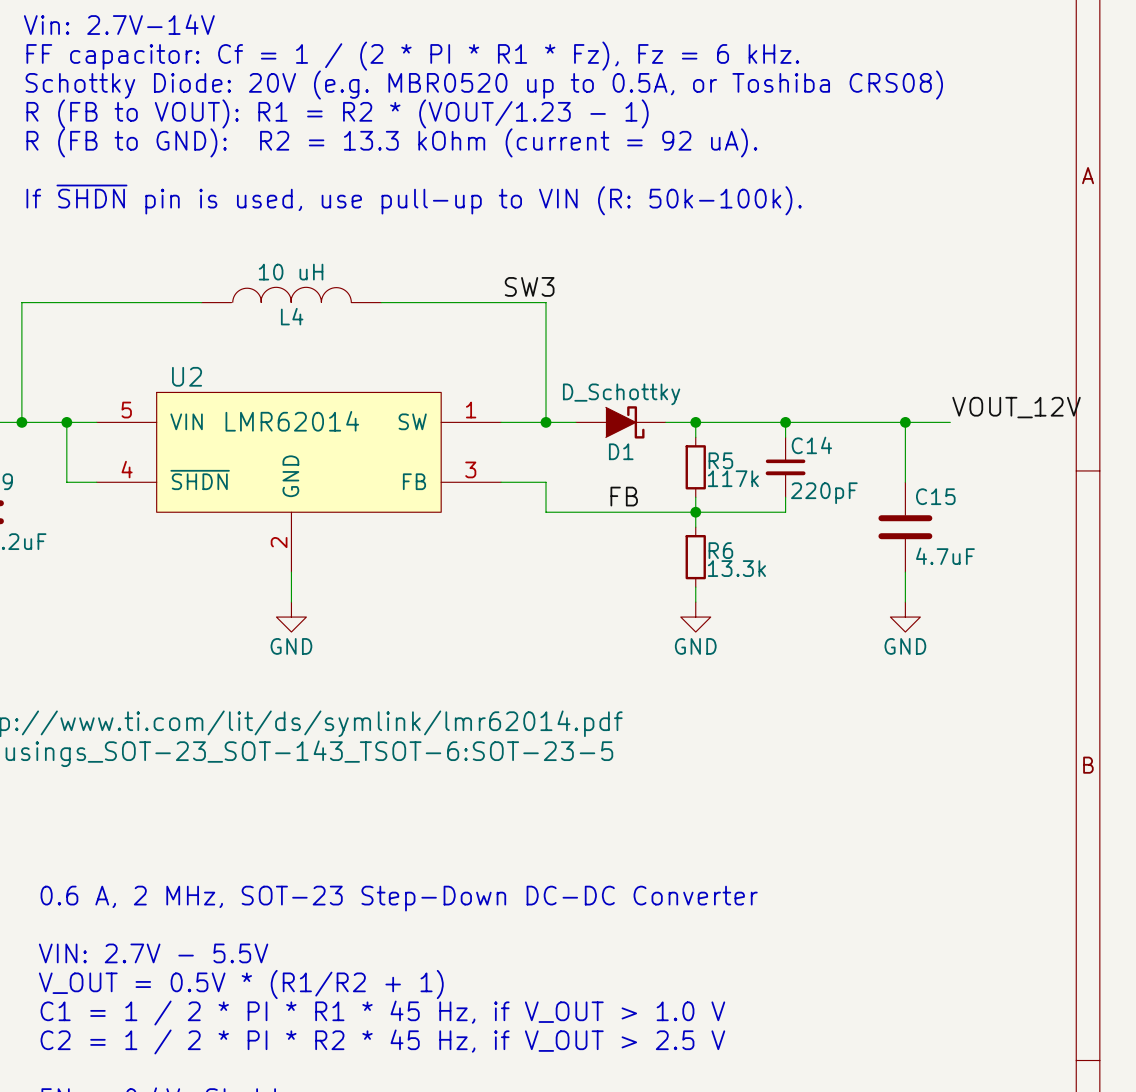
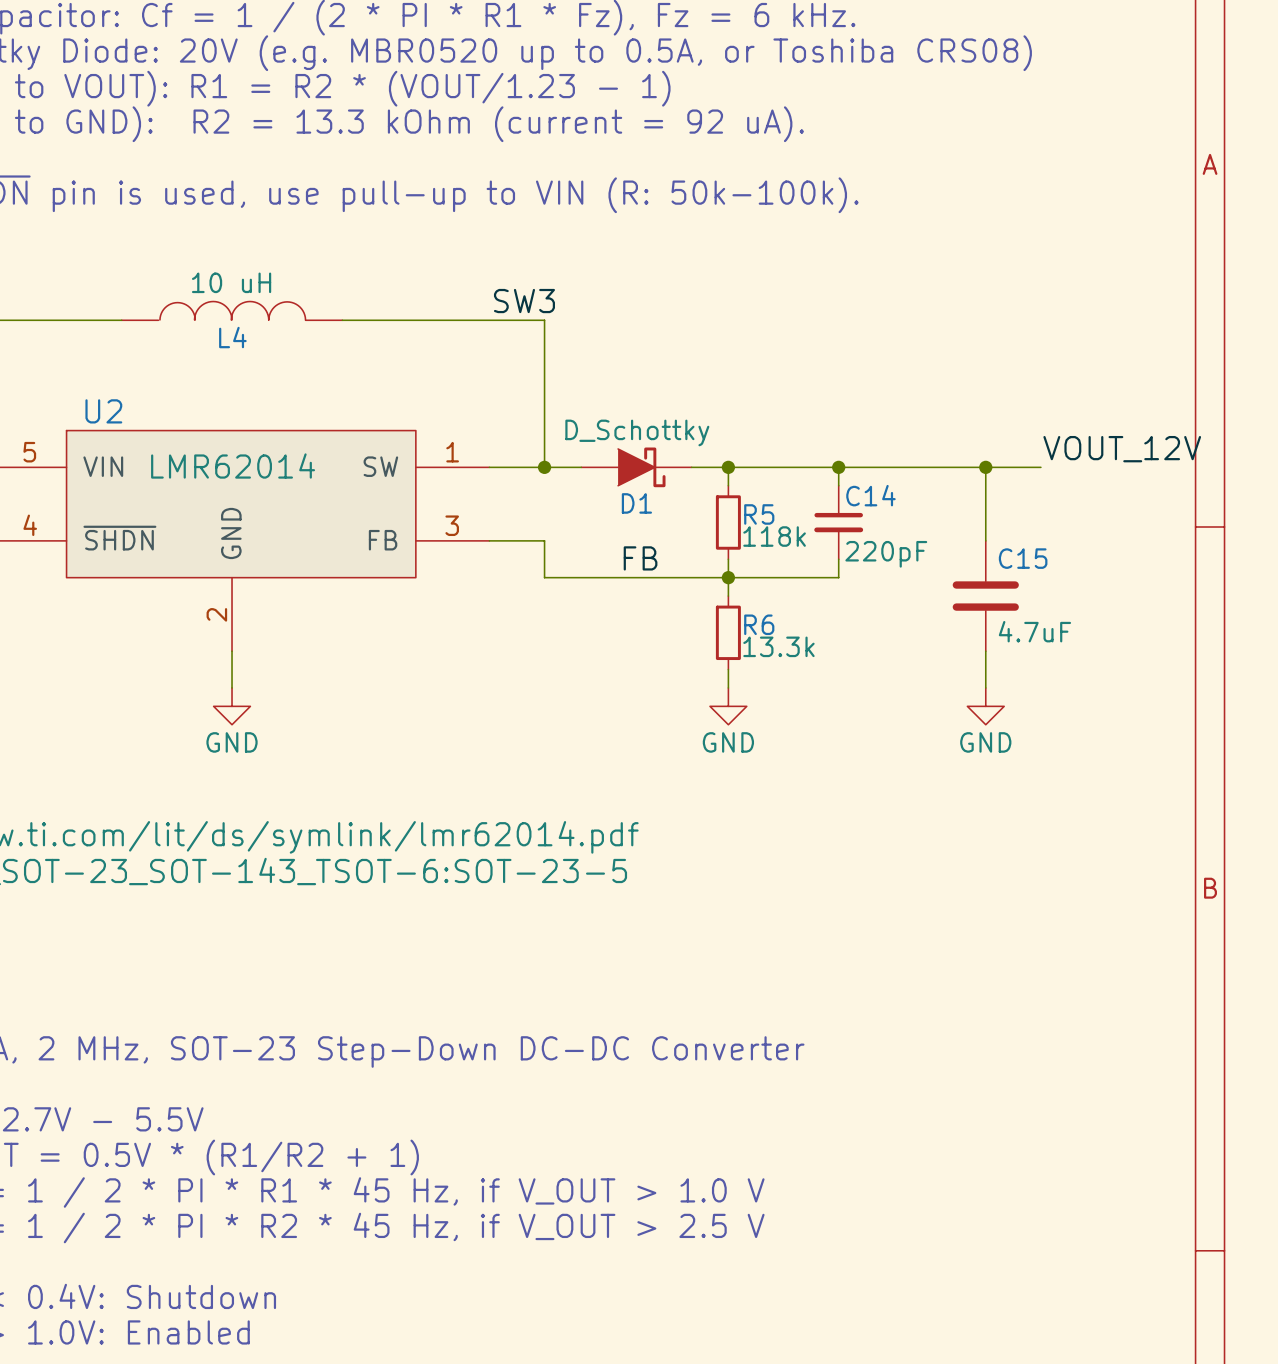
R5 value: 117k (733, 478) -> 118k (774, 536)

